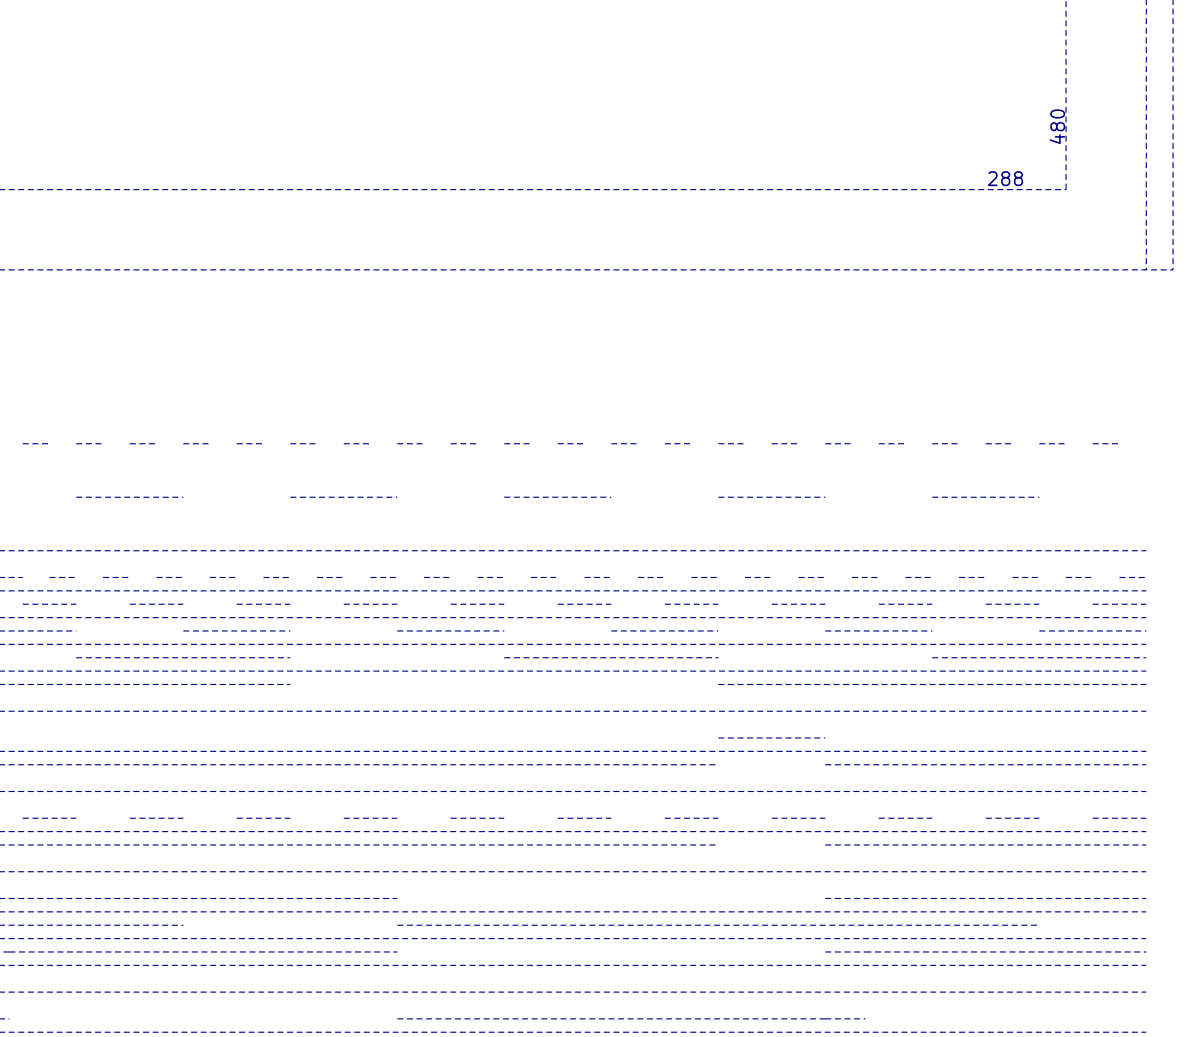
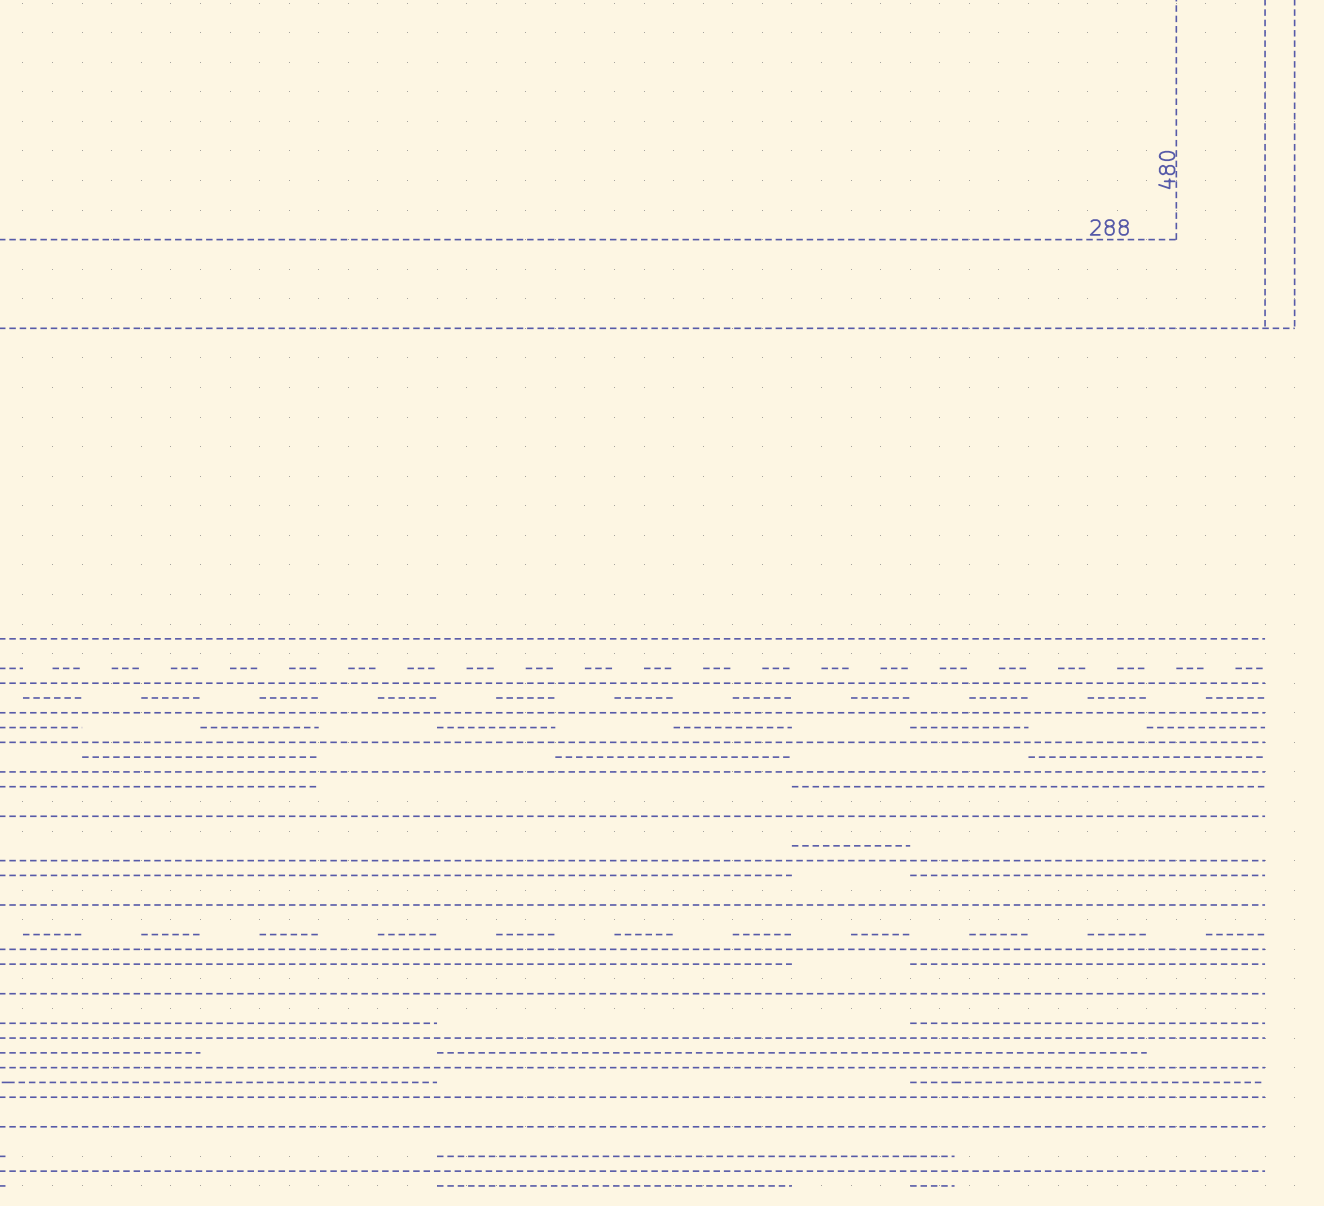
line: (22, 443) (49, 443) -> none
line: (76, 443) (103, 443) -> none
line: (129, 443) (156, 443) -> none
line: (183, 443) (210, 443) -> none
line: (236, 443) (263, 443) -> none
line: (290, 443) (317, 443) -> none
line: (343, 443) (370, 443) -> none
line: (397, 443) (424, 443) -> none
line: (450, 443) (477, 443) -> none
line: (504, 443) (531, 443) -> none
line: (557, 443) (584, 443) -> none
line: (611, 443) (638, 443) -> none
line: (664, 443) (691, 443) -> none
line: (718, 443) (745, 443) -> none
line: (771, 443) (798, 443) -> none
line: (825, 443) (852, 443) -> none
line: (878, 443) (905, 443) -> none
line: (932, 443) (959, 443) -> none
line: (985, 443) (1012, 443) -> none
line: (1039, 443) (1066, 443) -> none
line: (1092, 443) (1119, 443) -> none
line: (76, 497) (183, 497) -> none
line: (290, 497) (397, 497) -> none
line: (504, 497) (611, 497) -> none
line: (718, 497) (825, 497) -> none
line: (932, 497) (1039, 497) -> none

